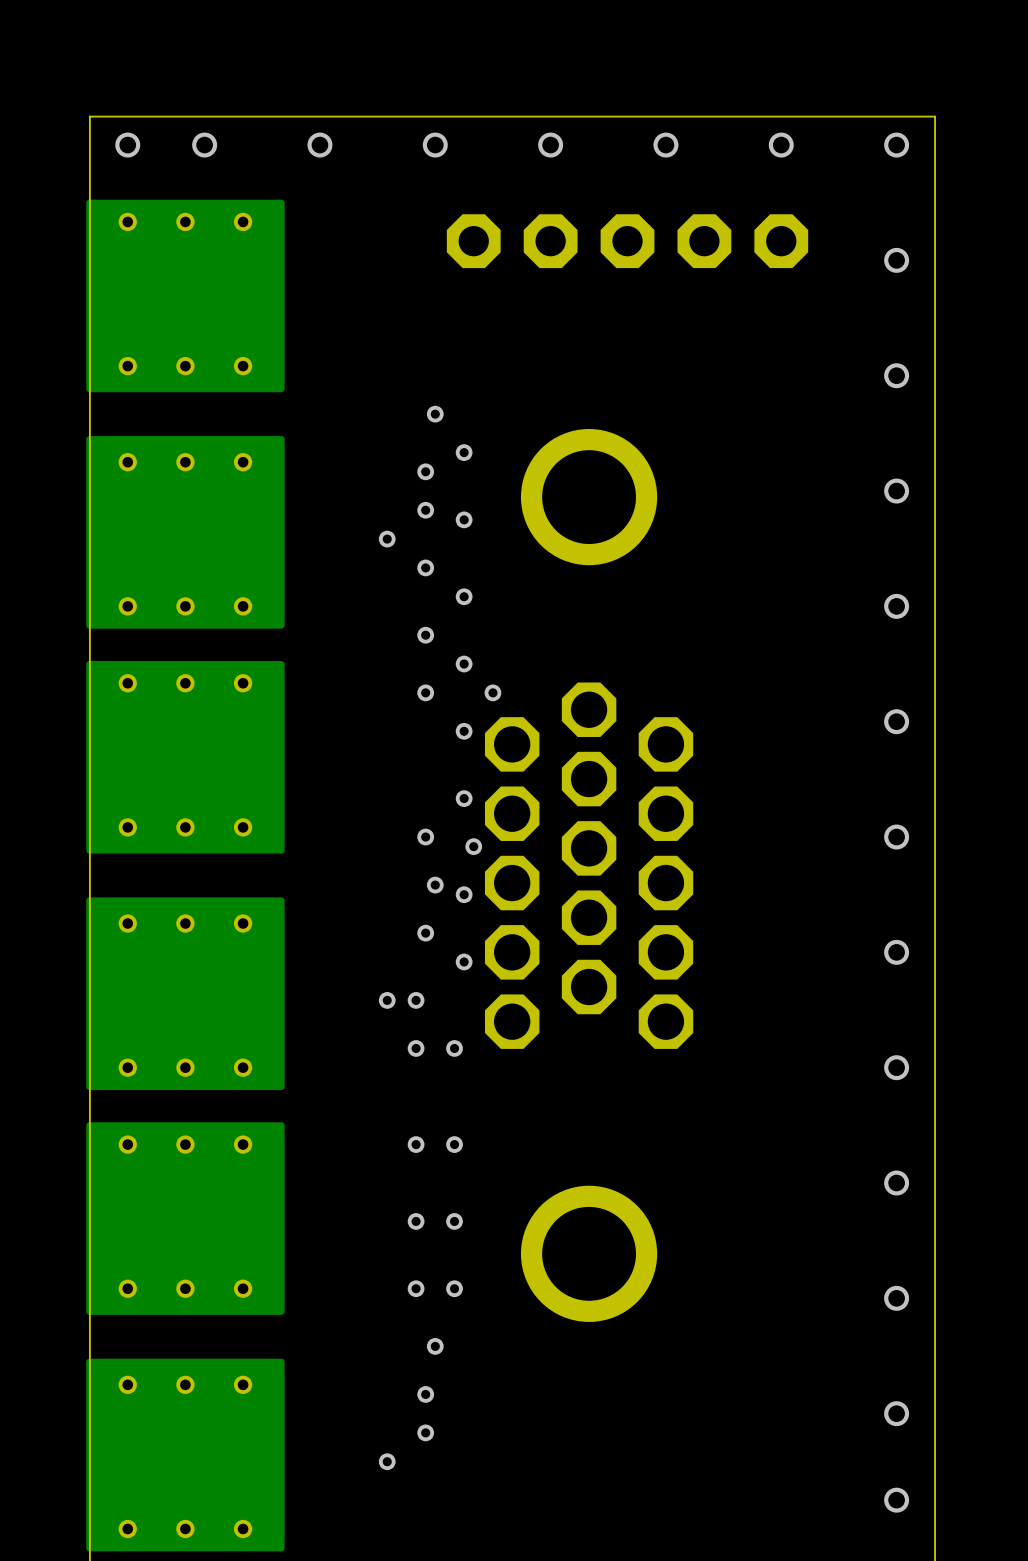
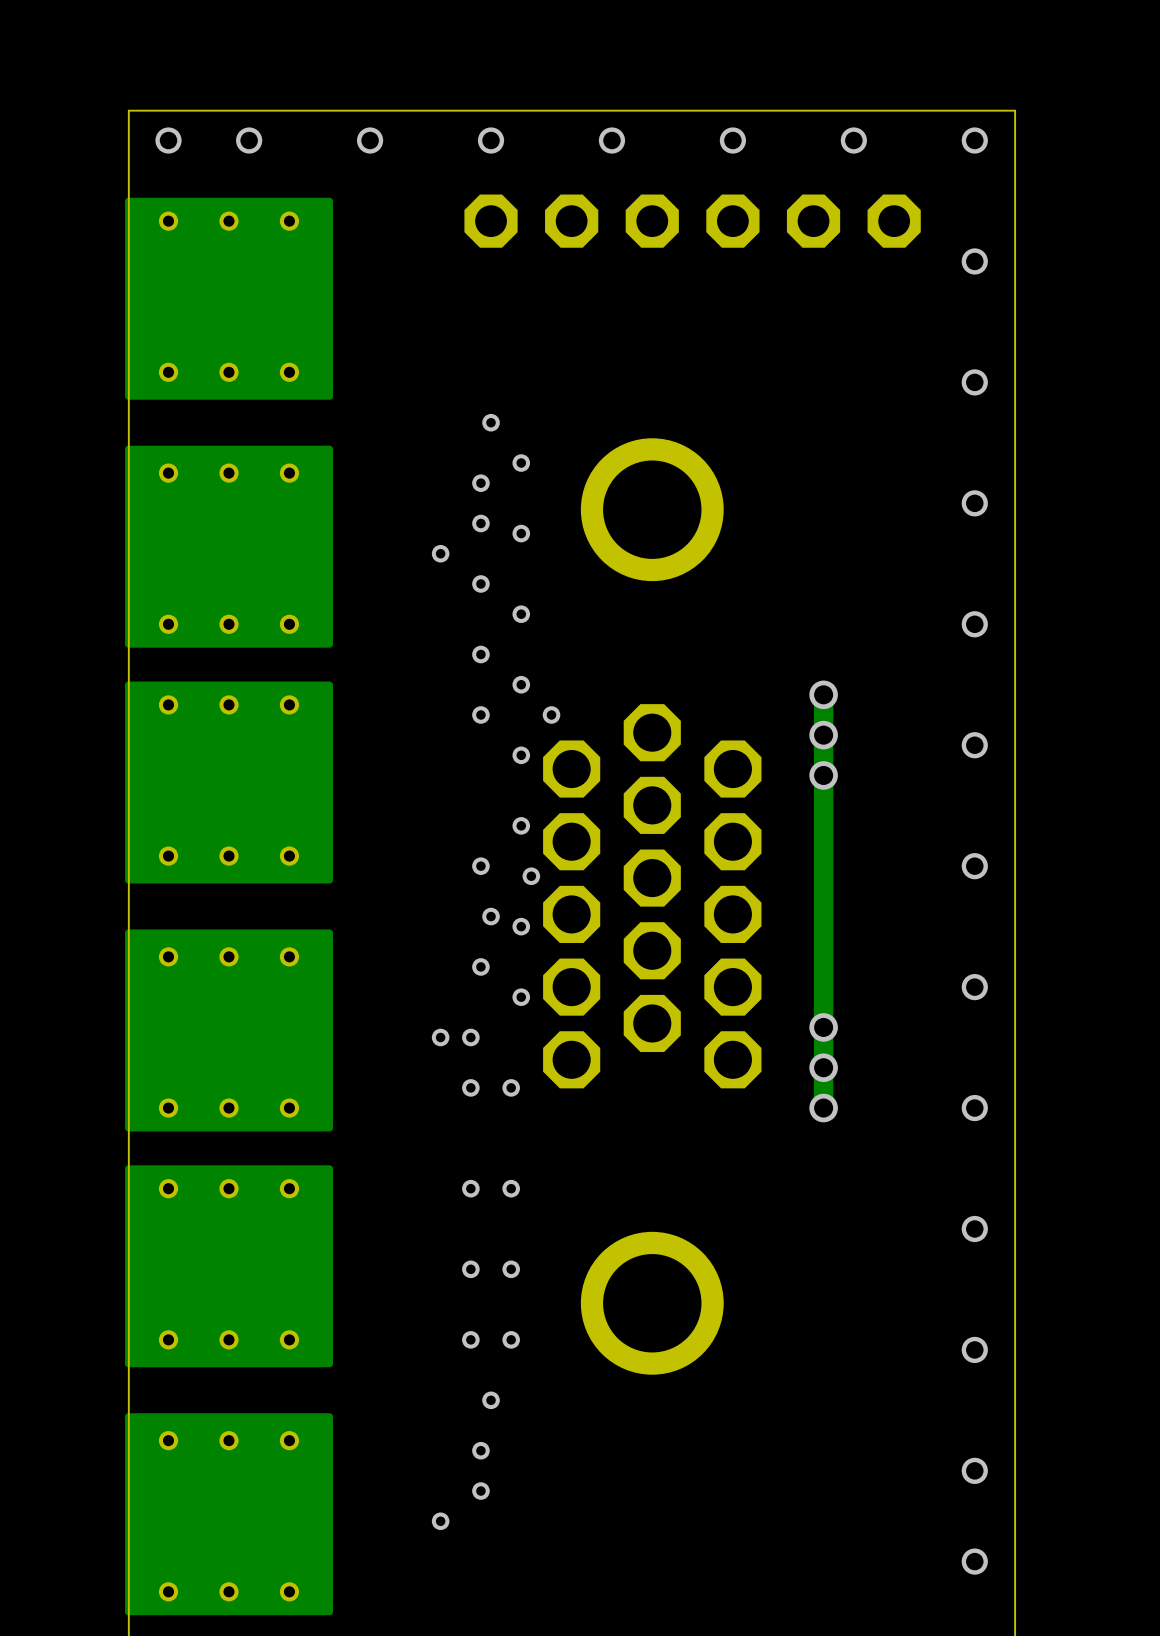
part footprint: [446, 214, 809, 269] -> [464, 194, 921, 248]
track: none -> (823, 694) (823, 1108)
via: none -> (823, 694)
via: none -> (823, 735)
via: none -> (823, 775)
via: none -> (823, 1027)
via: none -> (823, 1067)
via: none -> (823, 1108)

